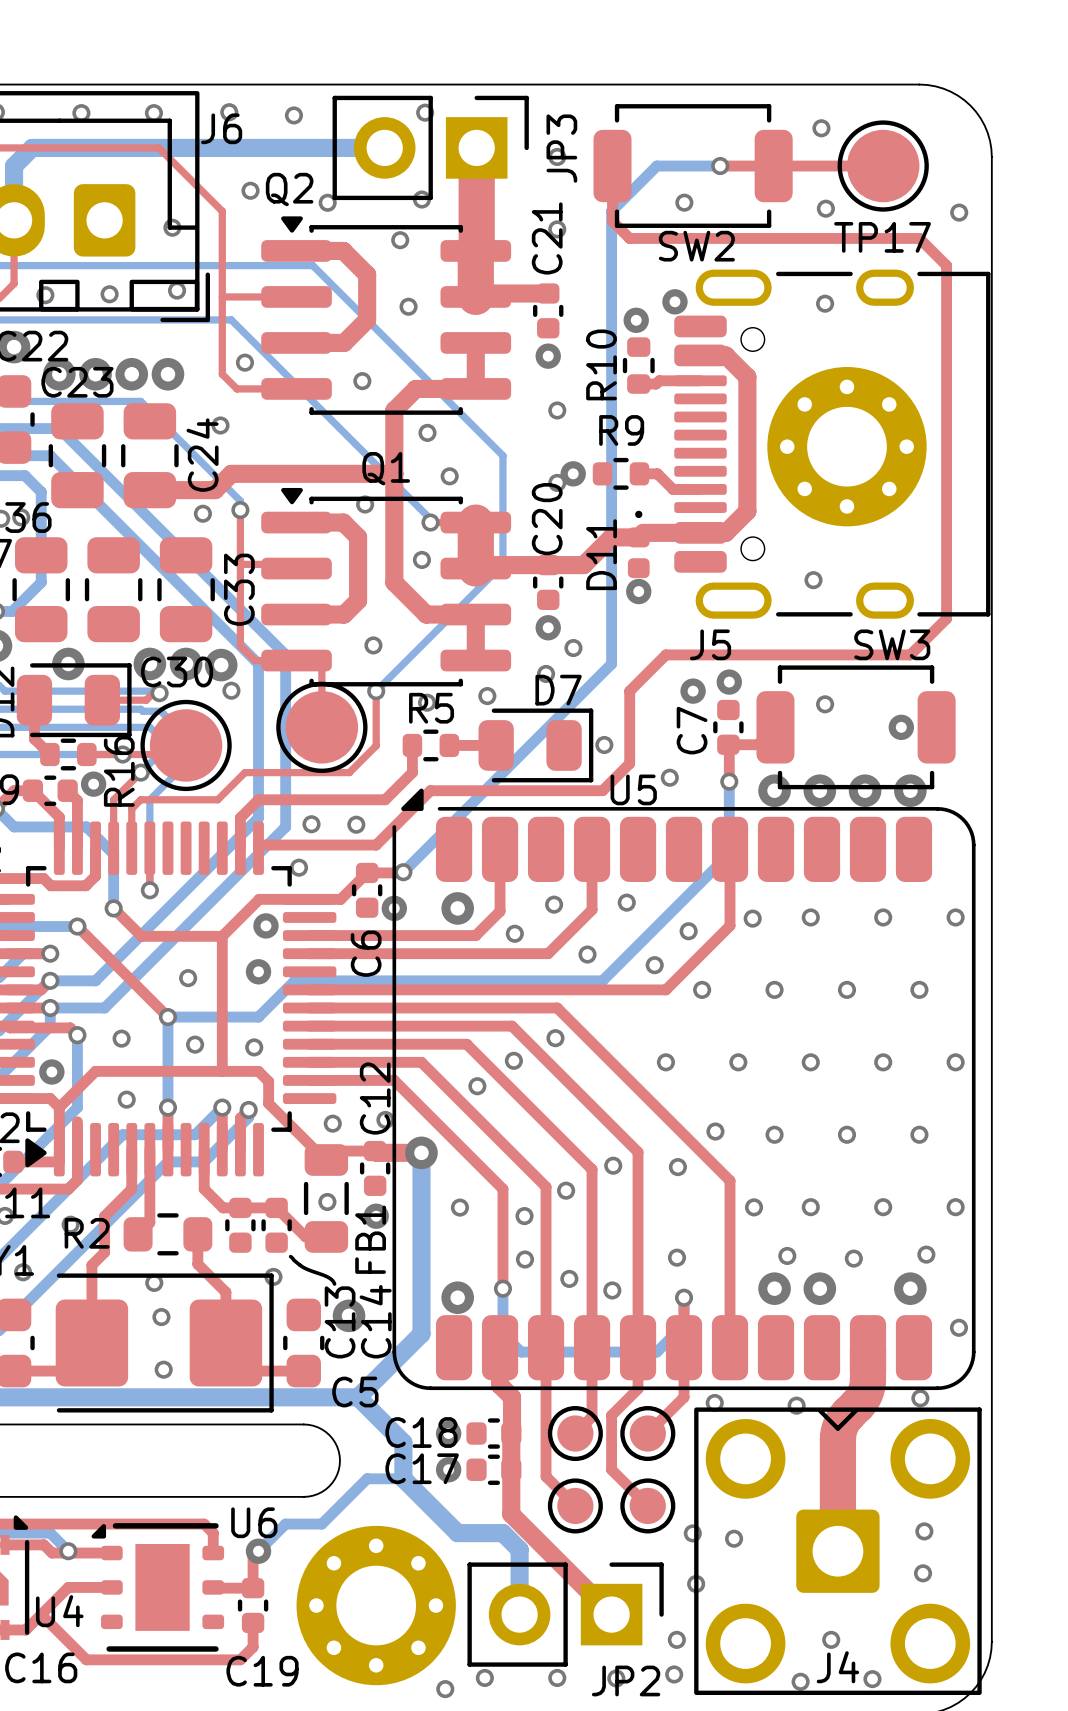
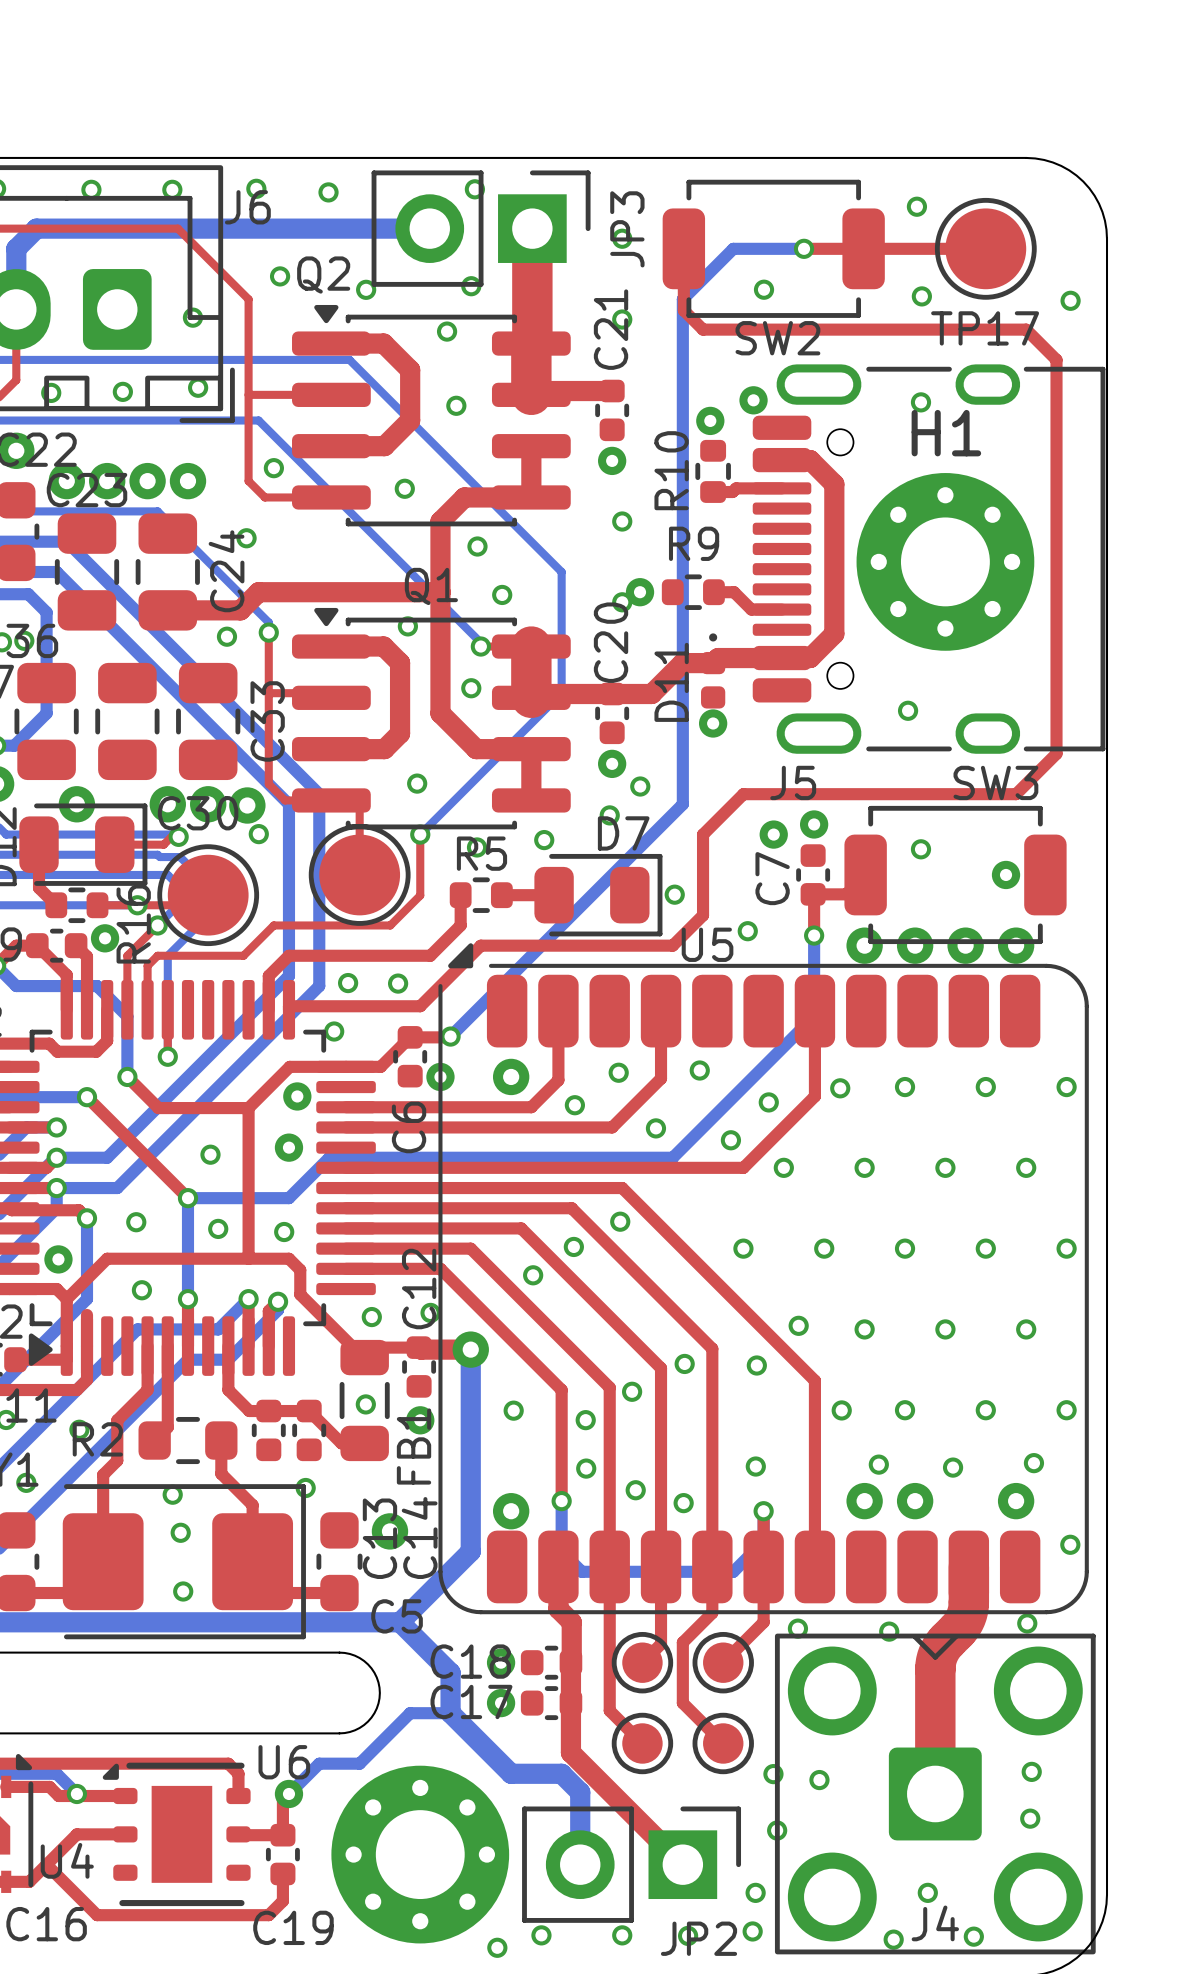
H1 name: none -> H1 (946, 433)
line: (290, 1256) (302, 1266) (327, 1276) (334, 1284) -> none

